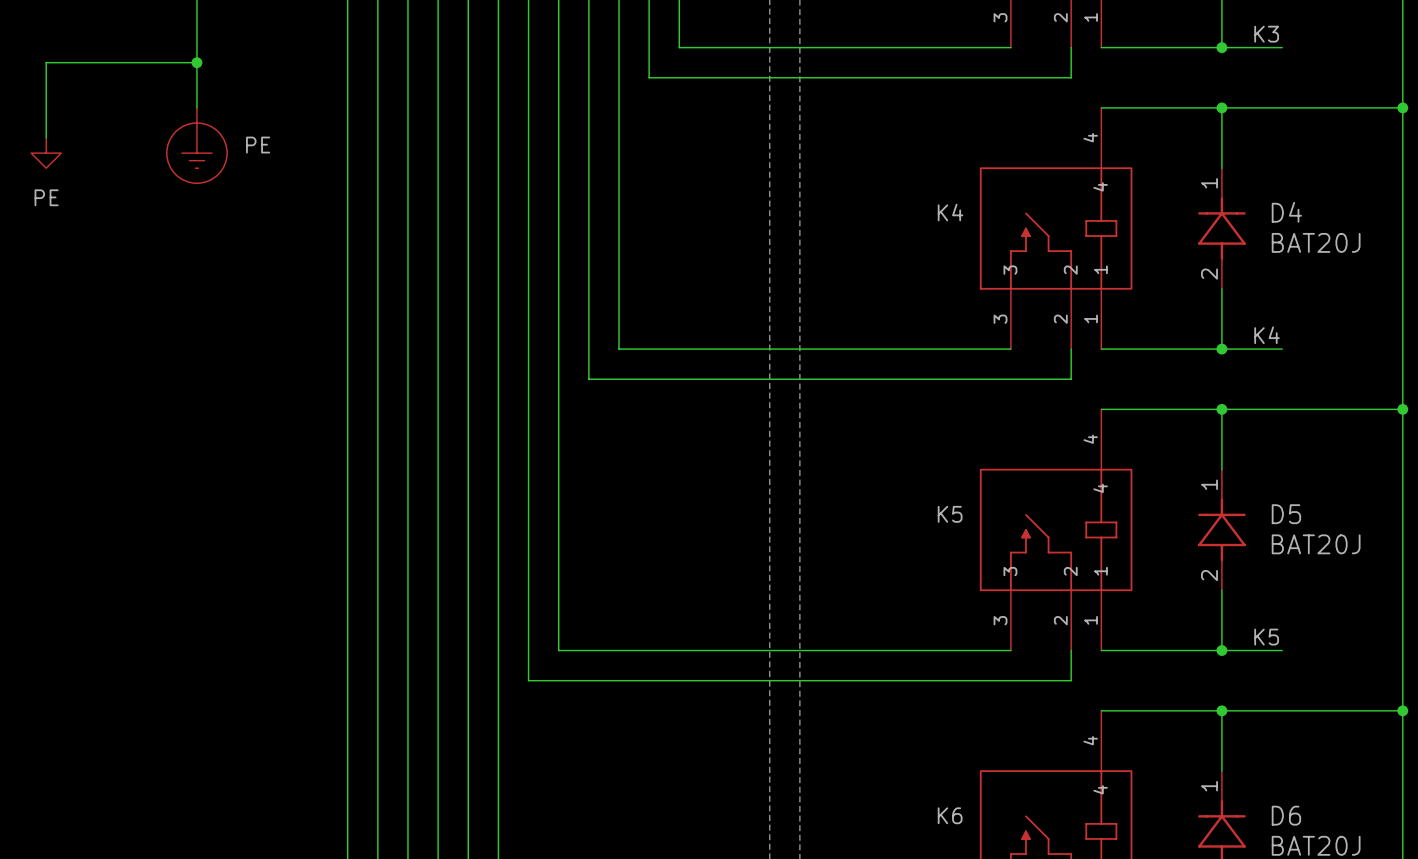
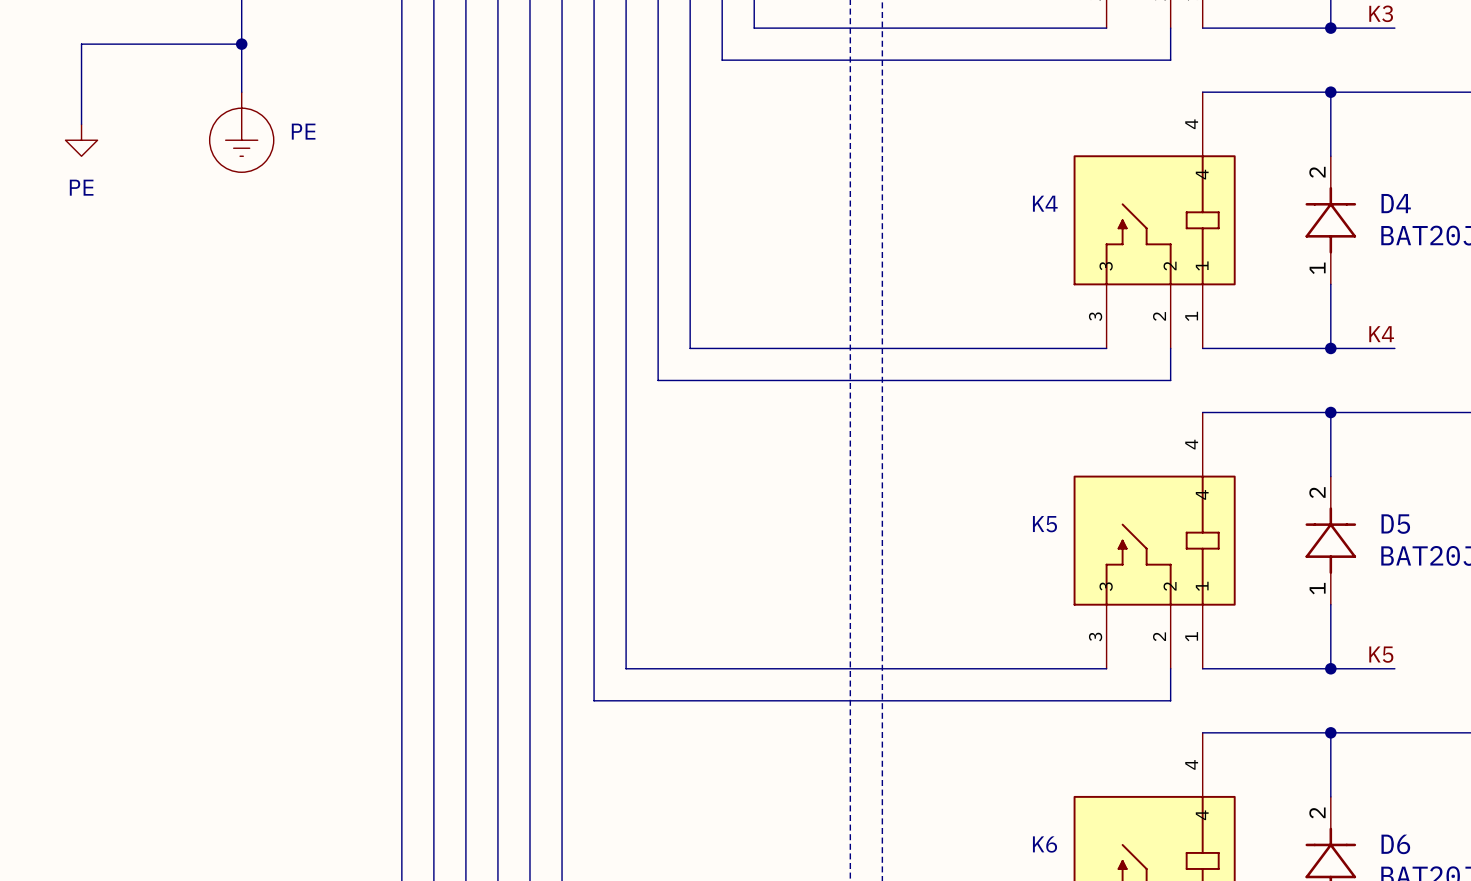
D4 pin number: 1 (1209, 183) -> 2 (1317, 172)
D4 pin number: 2 (1209, 274) -> 1 (1317, 268)
D5 pin number: 1 (1209, 484) -> 2 (1317, 492)
D5 pin number: 2 (1209, 575) -> 1 (1317, 588)
D6 pin number: 1 (1209, 786) -> 2 (1317, 812)

